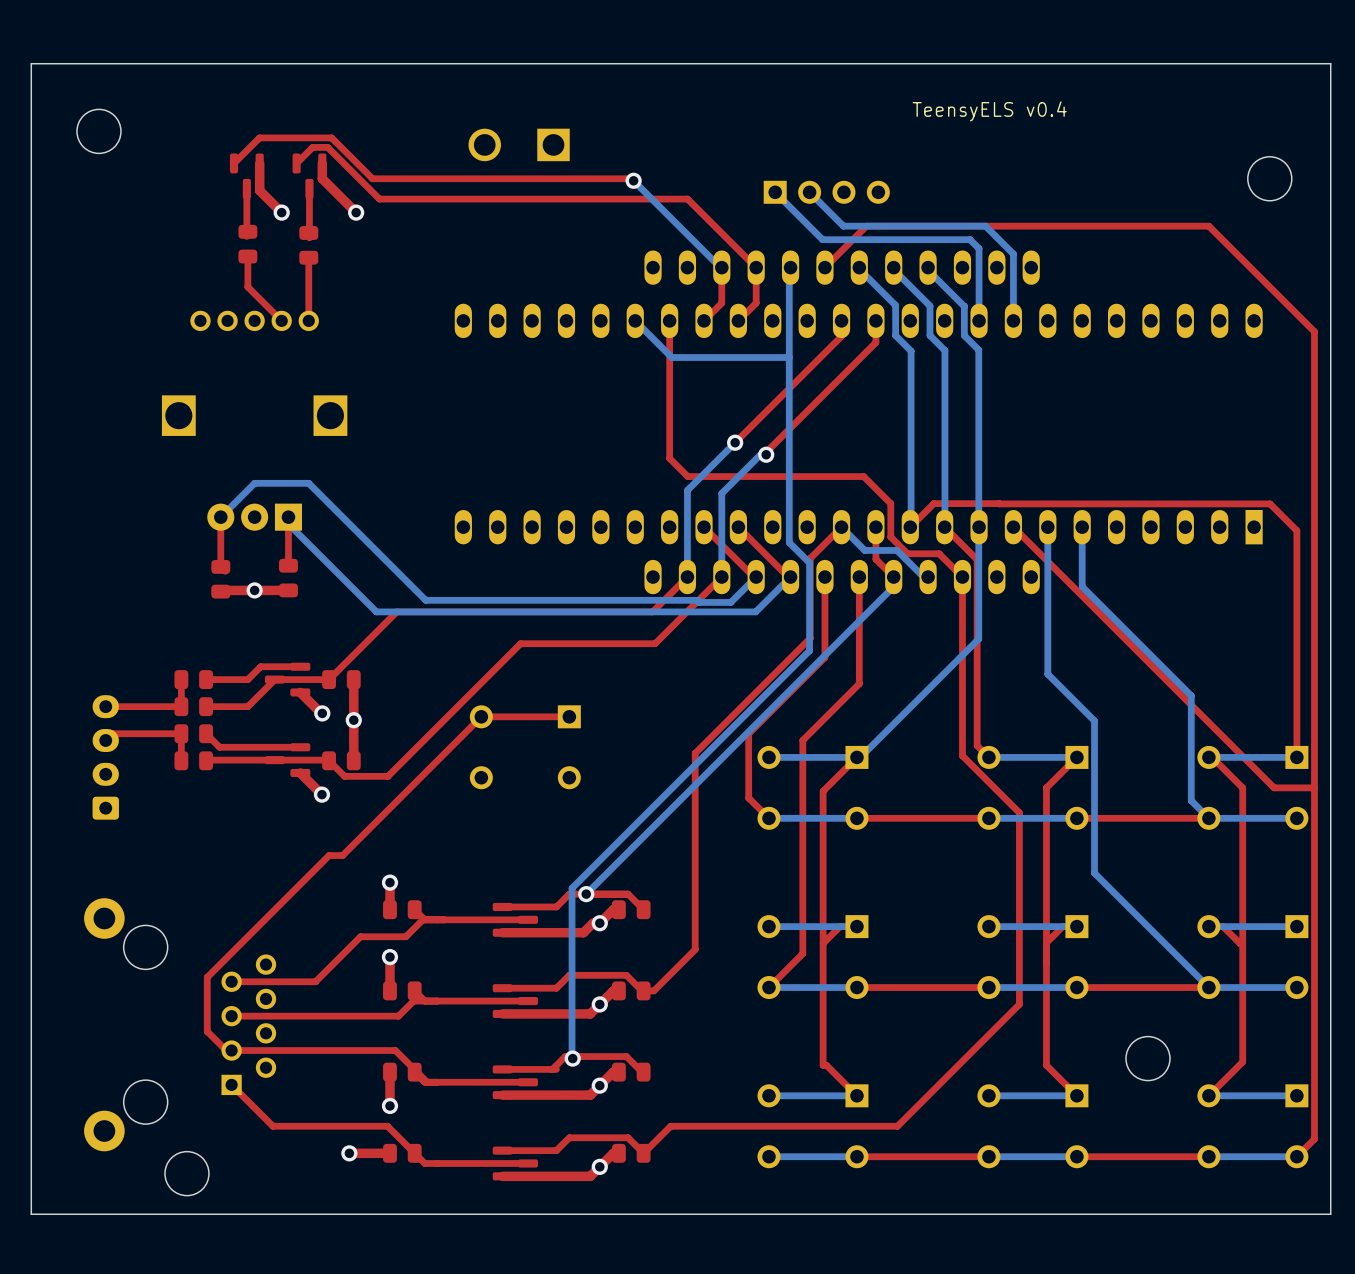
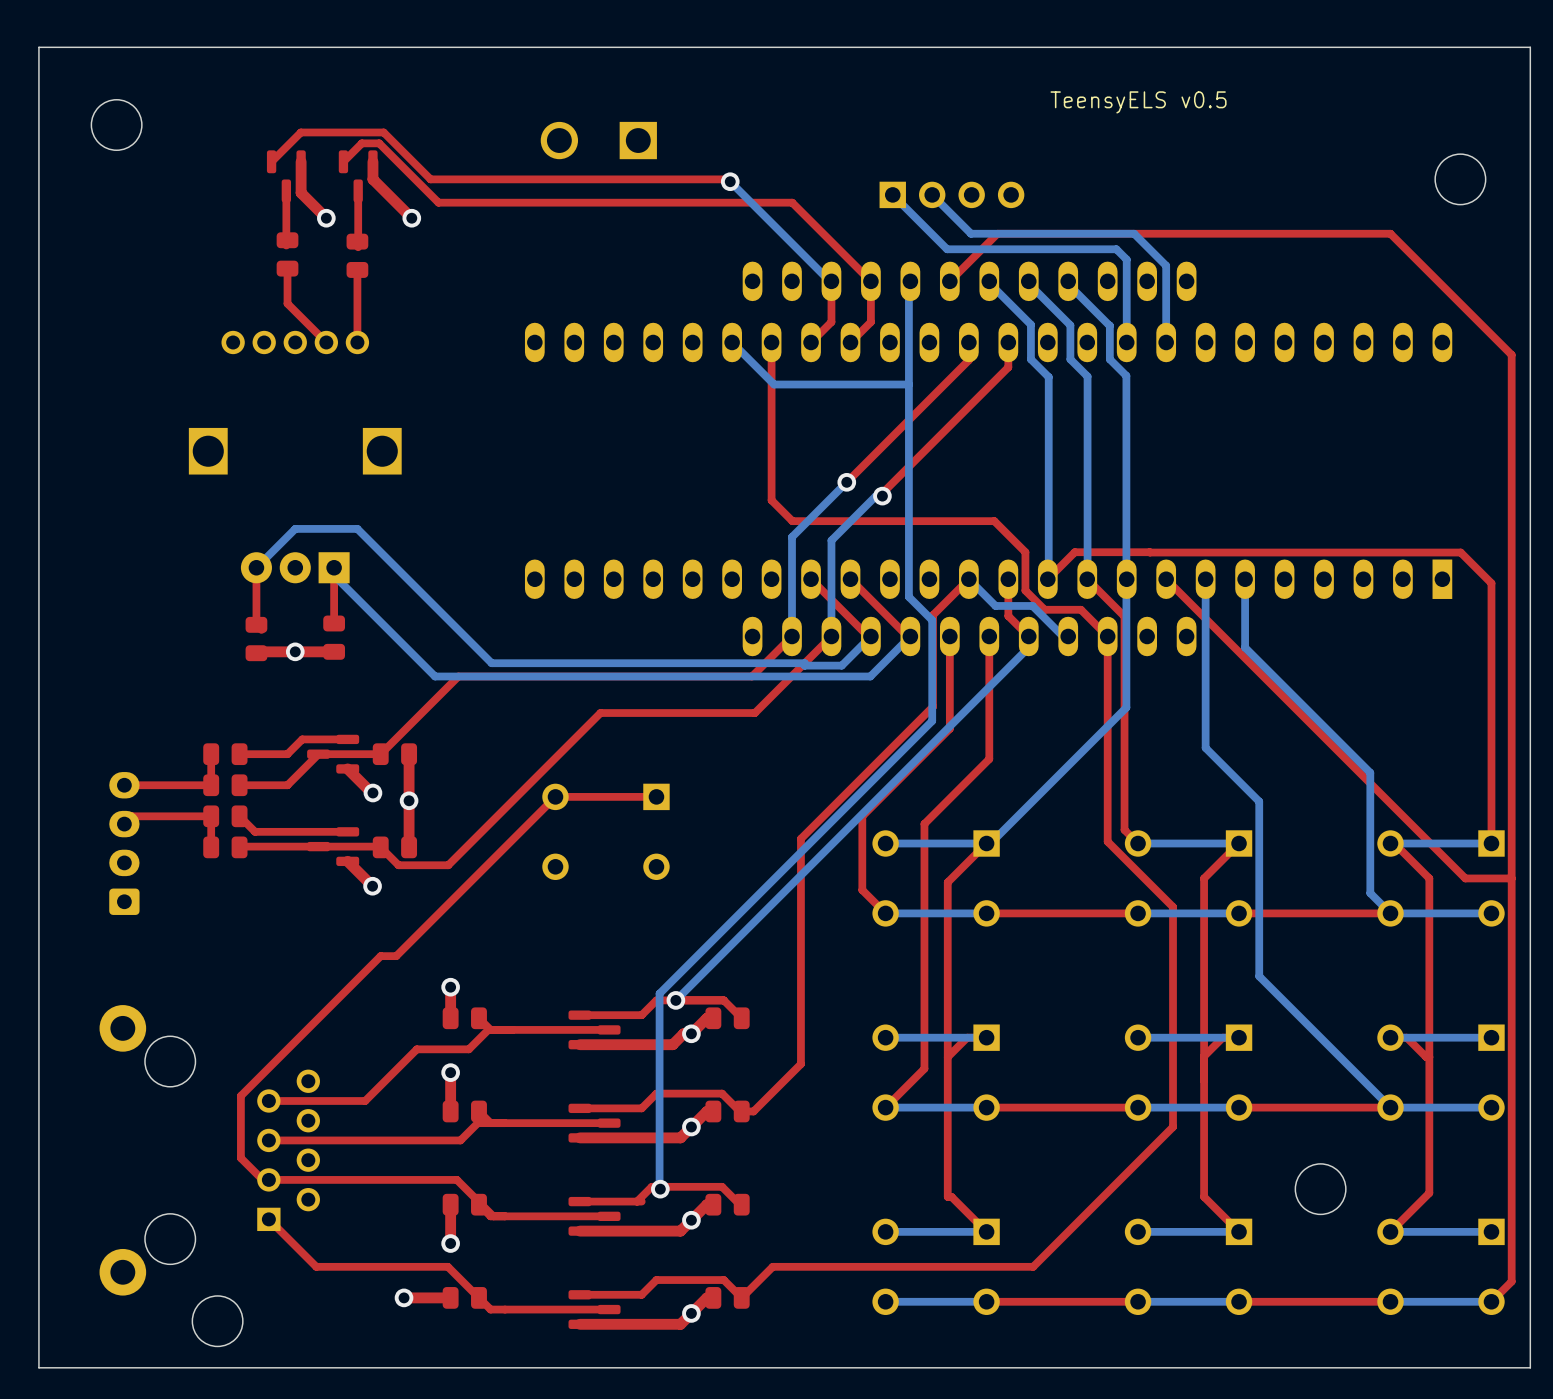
text: TeensyELS v0.4 (989, 111) -> TeensyELS v0.5 (1138, 102)

